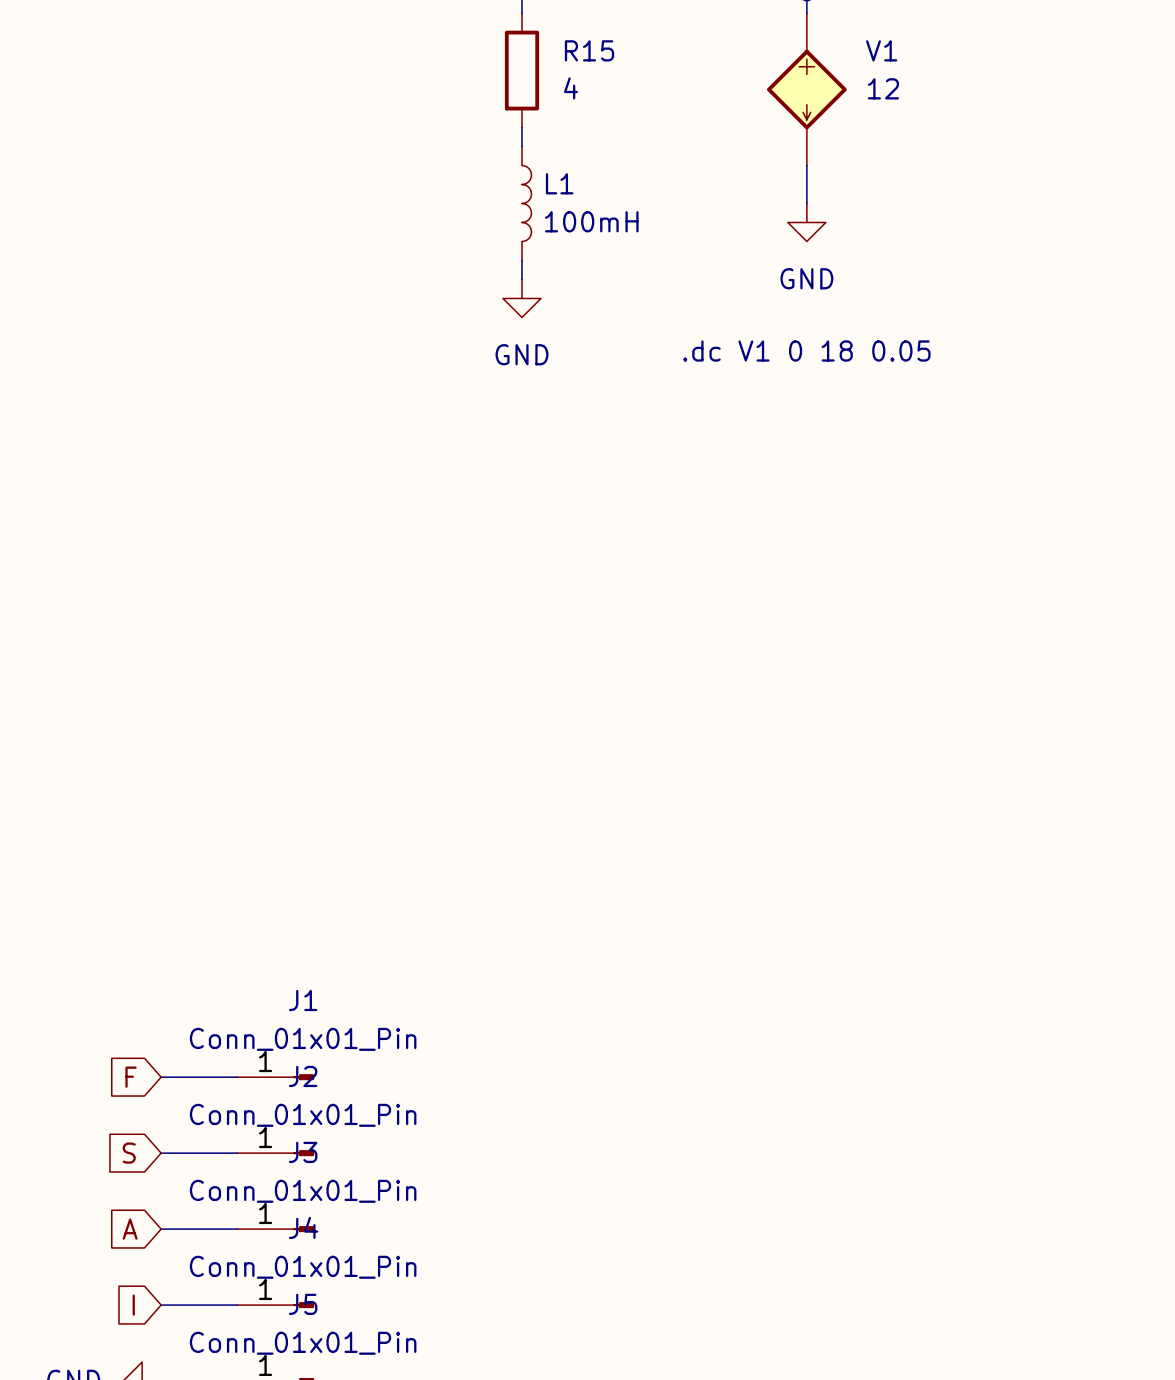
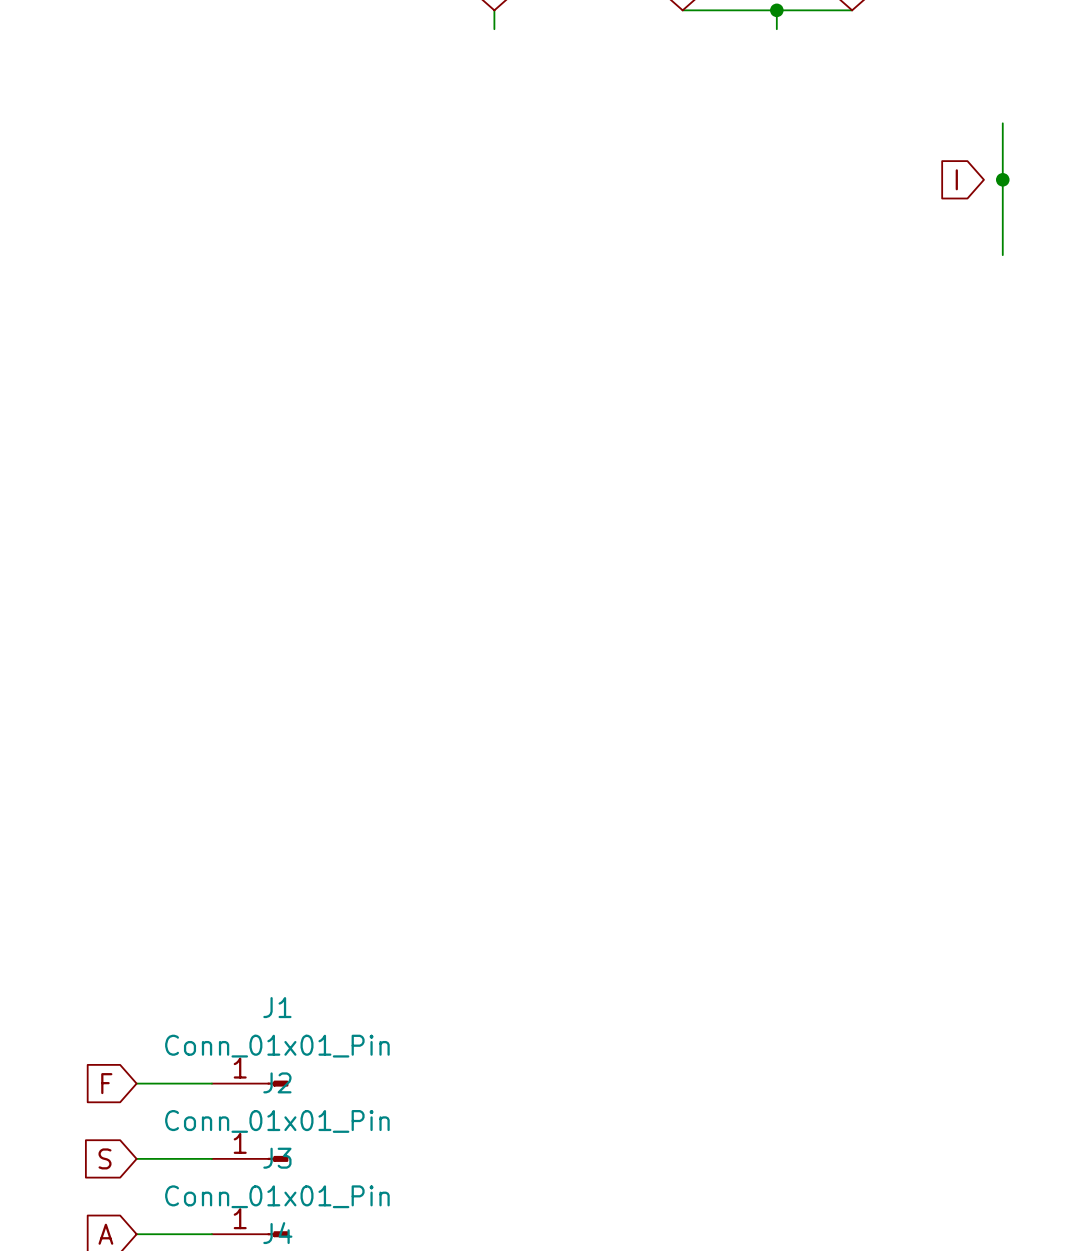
R15: 4 (521, 70) -> none
V1: 12 (806, 89) -> none
wire: none -> (1002, 123) (1002, 255)
wire: (521, 127) (521, 146) -> none
wire: (806, 165) (806, 203) -> none
global label: none -> I (956, 179)
junction: none -> (1002, 179)
L1: 100mH (526, 203) -> none
power symbol: GND (806, 222) -> none
wire: (521, 260) (521, 279) -> none
power symbol: GND (521, 298) -> none
text: .dc V1 0 18 0.05 (806, 351) -> none

